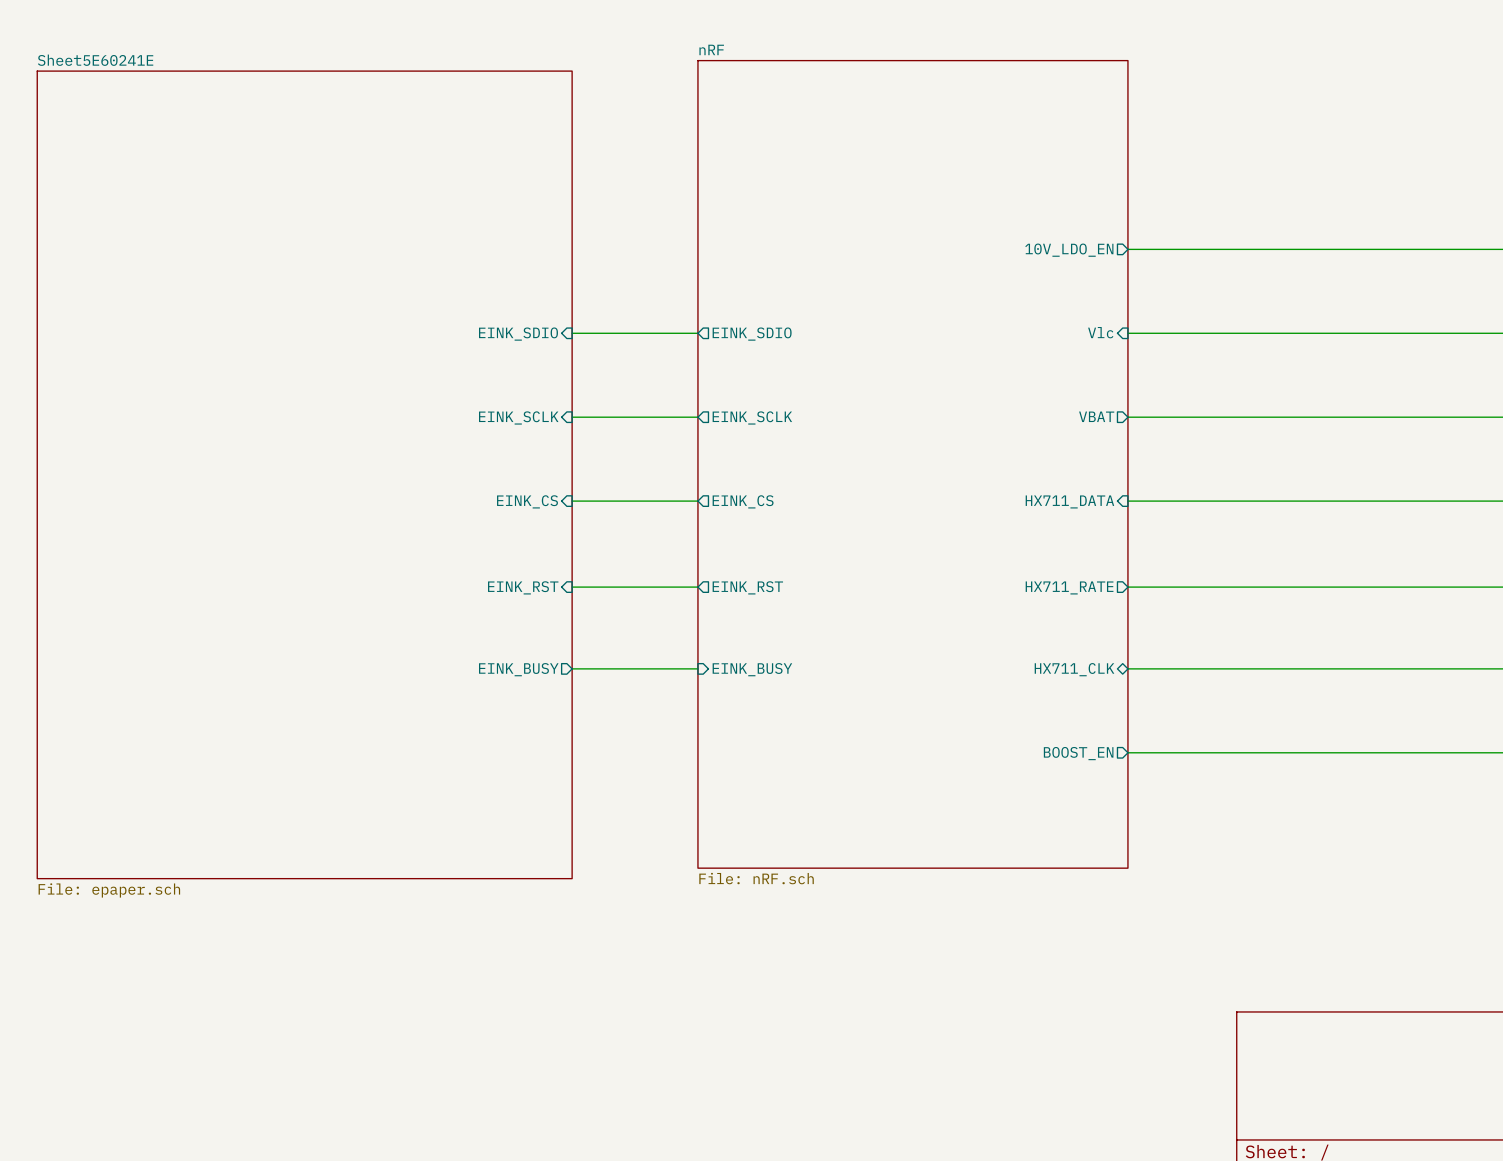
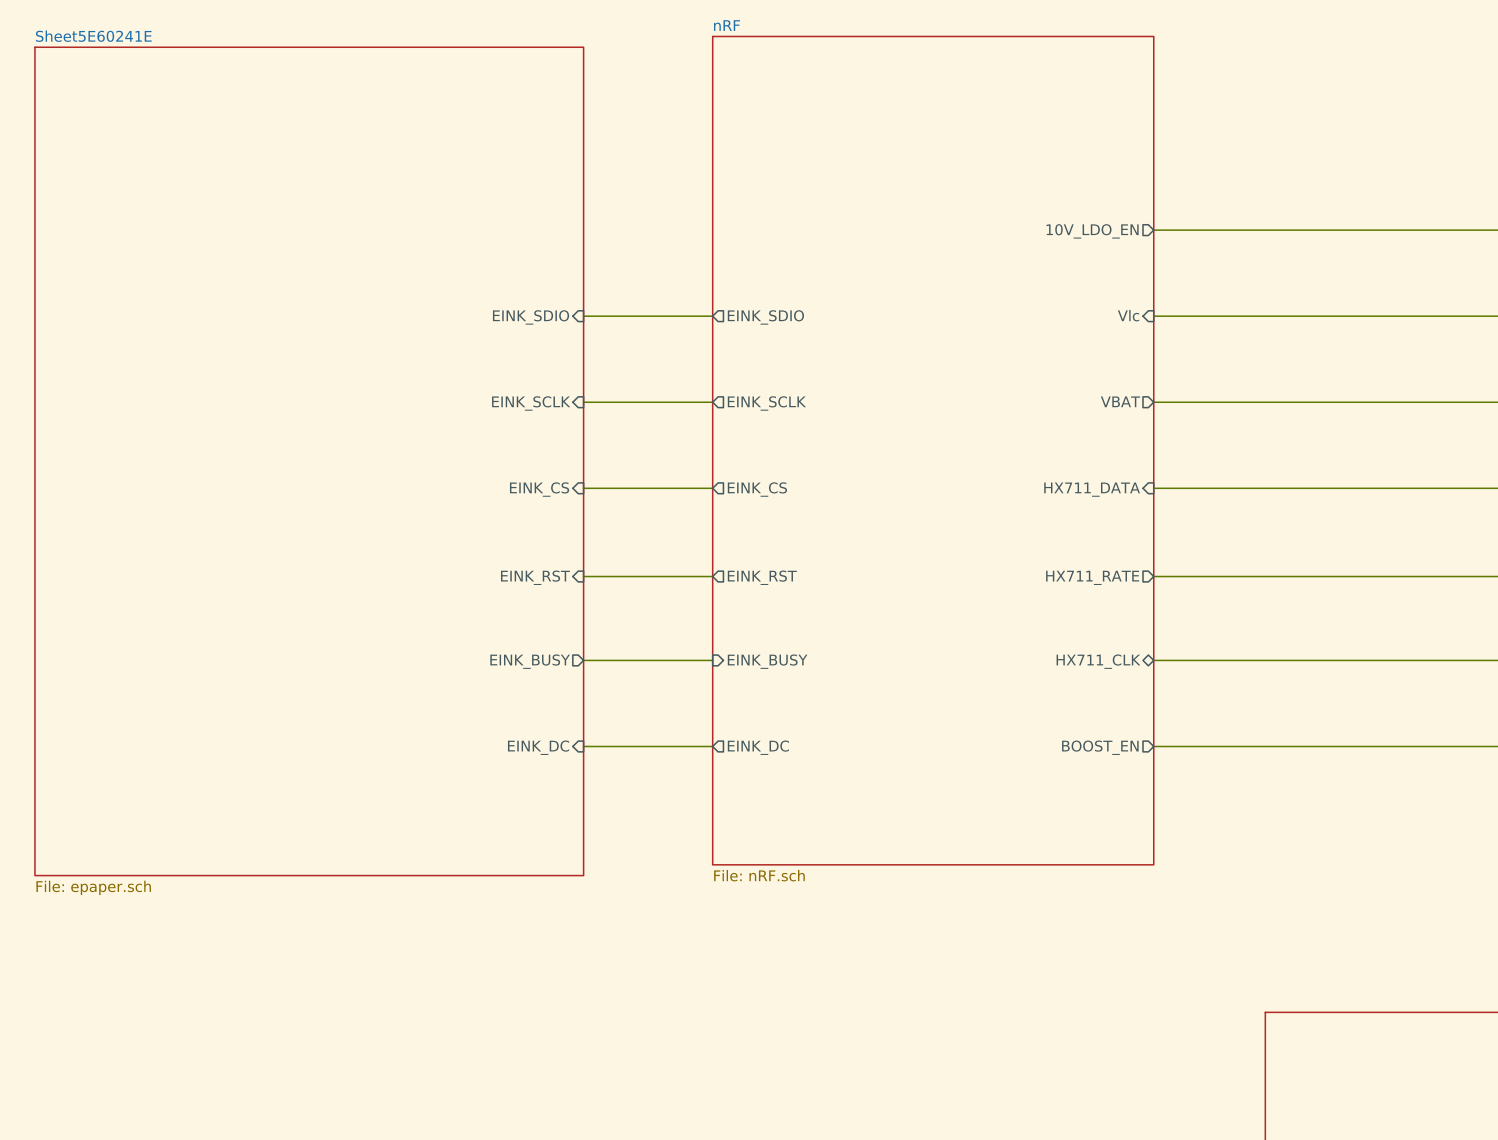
wire: none -> (583, 746) (712, 746)
sheet pin: none -> EINK_DC (538, 747)
sheet pin: none -> EINK_DC (758, 747)

